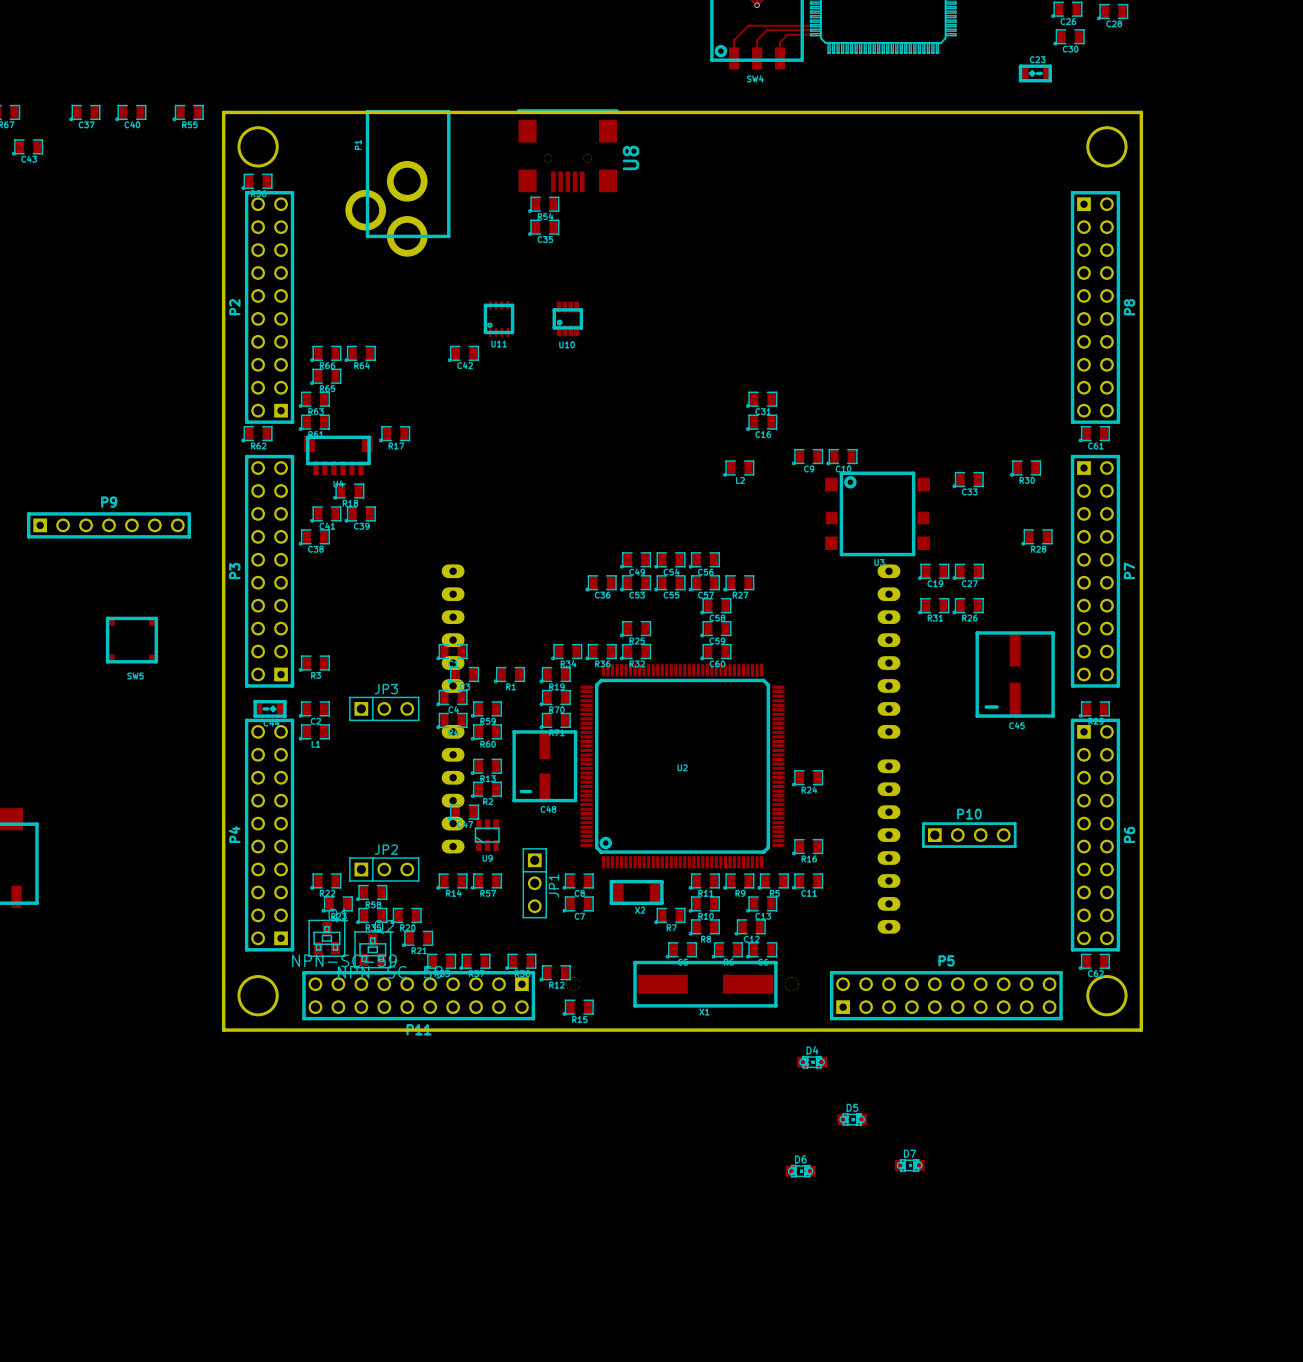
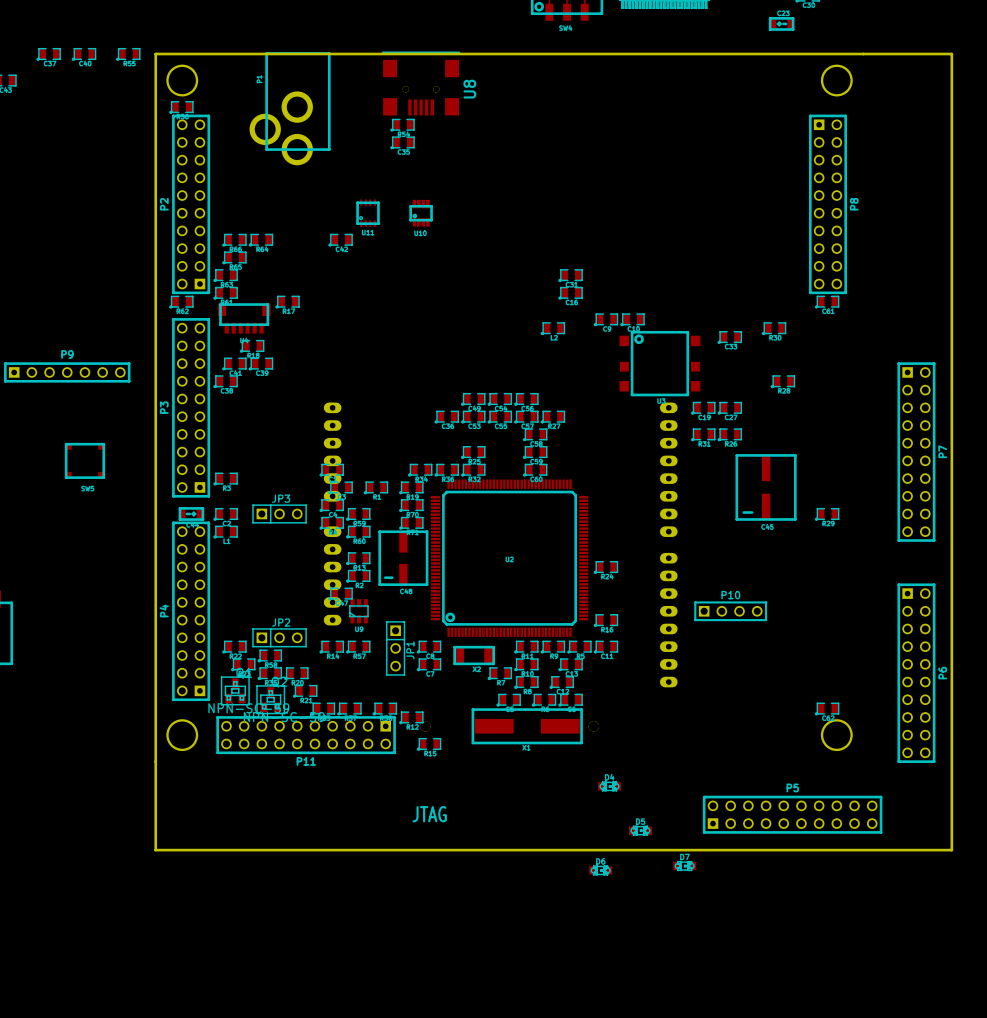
board edge: (1141, 112) (1141, 1030) (223, 1030) -> (863, 54) (951, 54) (951, 850) (155, 850) (155, 761)
P7 position: (1095, 571) -> (916, 452)
P6 position: (1095, 835) -> (916, 673)
P5 position: (946, 995) -> (792, 814)
text: none -> JTAG (429, 814)

